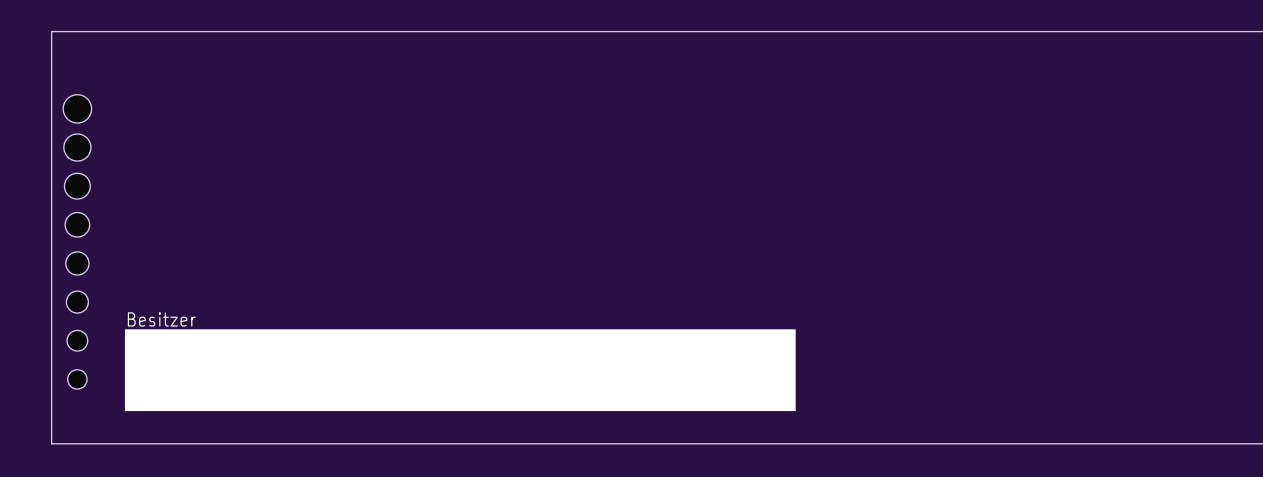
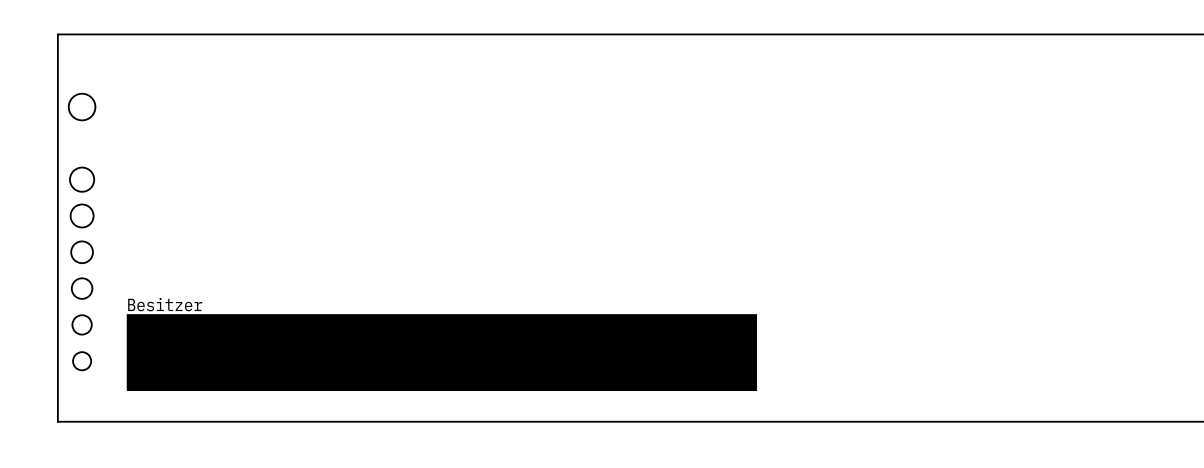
hole: (77, 147) -> none

